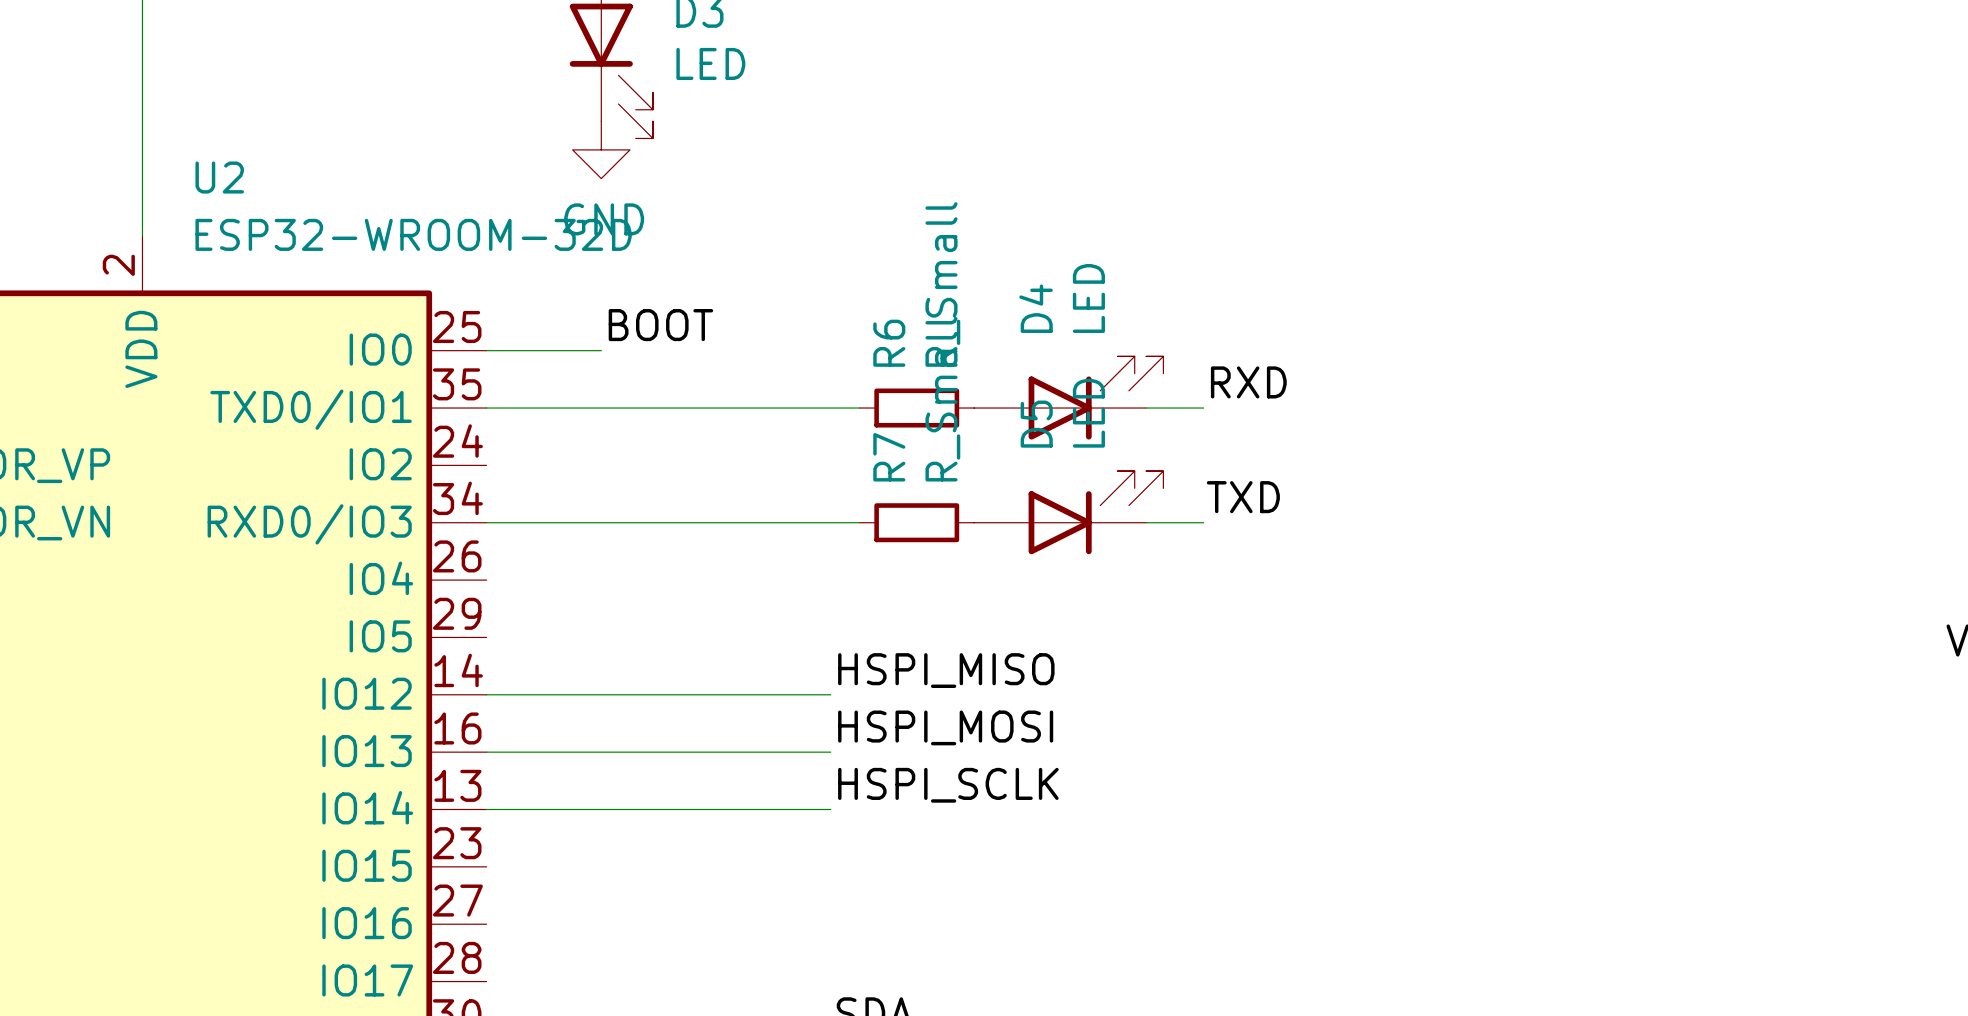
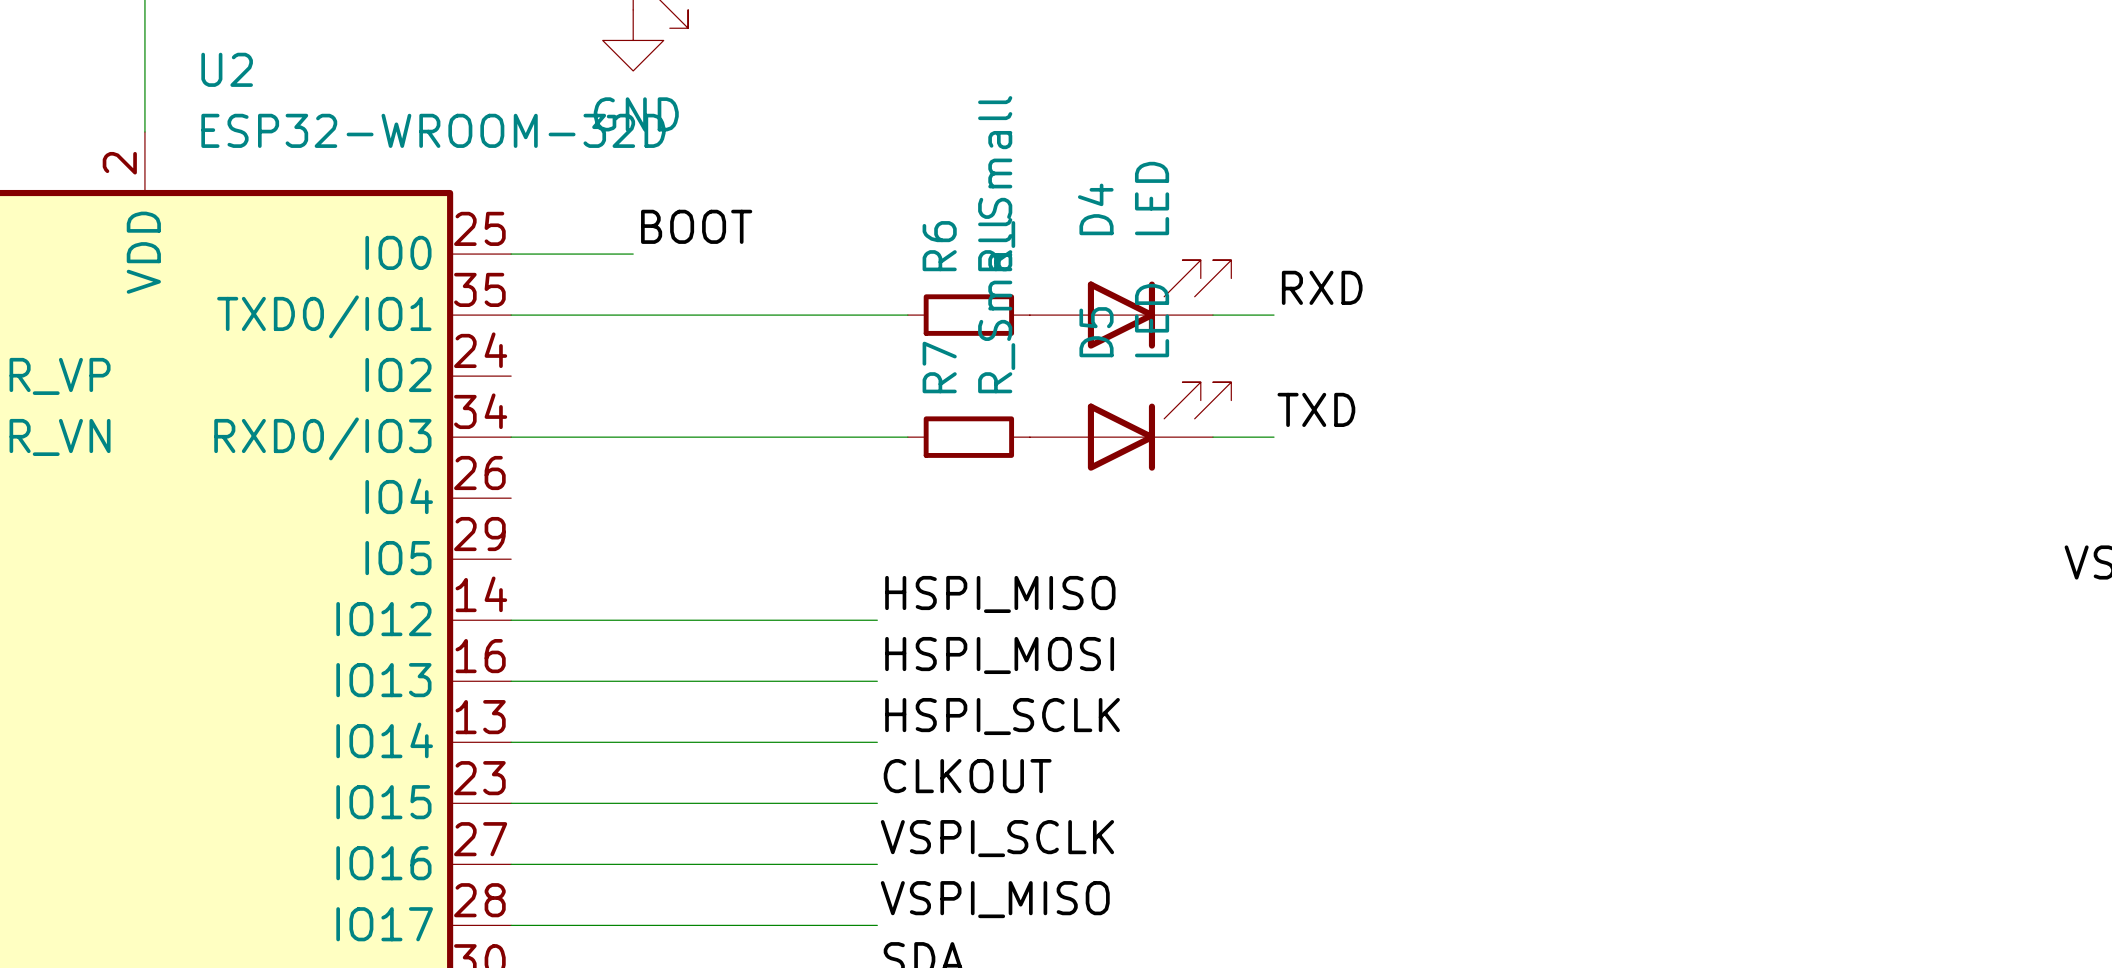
label: none -> CLKOUT (967, 776)
wire: none -> (511, 803) (877, 803)
label: none -> VSPI_SCLK (997, 838)
wire: none -> (511, 864) (877, 864)
label: none -> VSPI_MISO (995, 899)
wire: none -> (511, 925) (877, 925)

